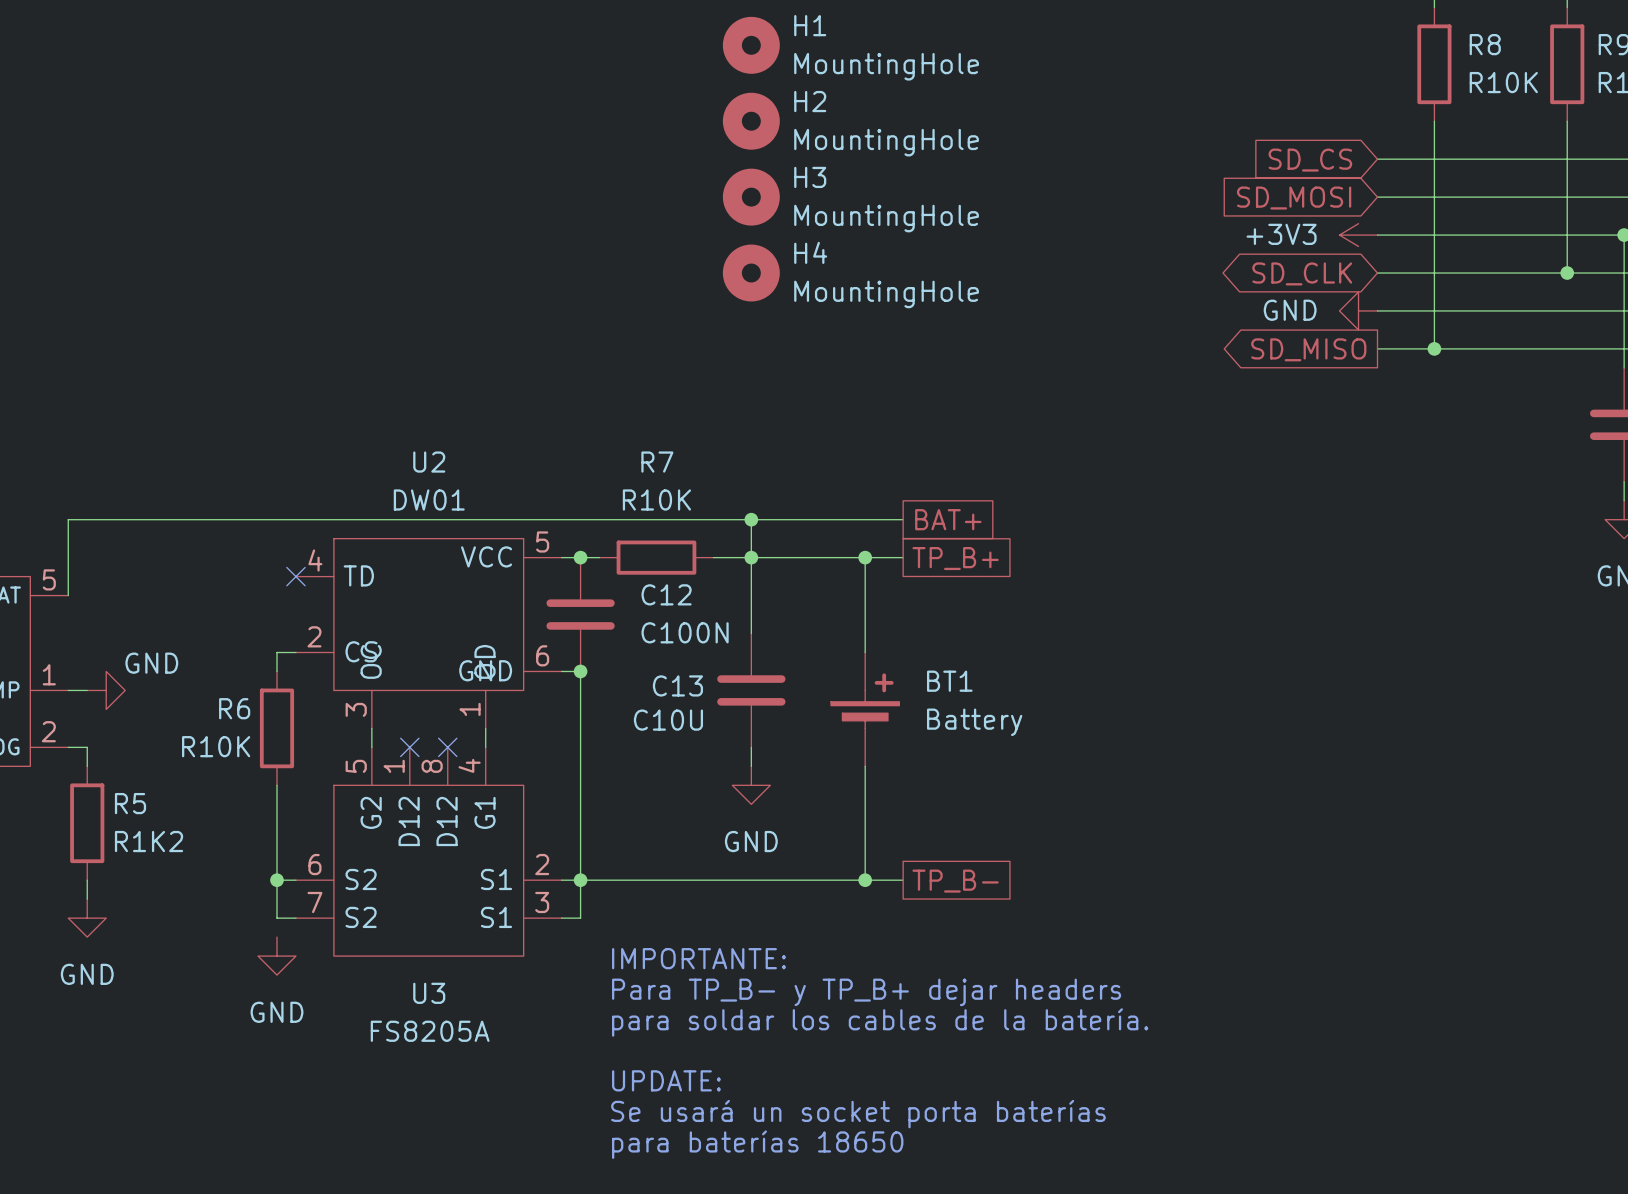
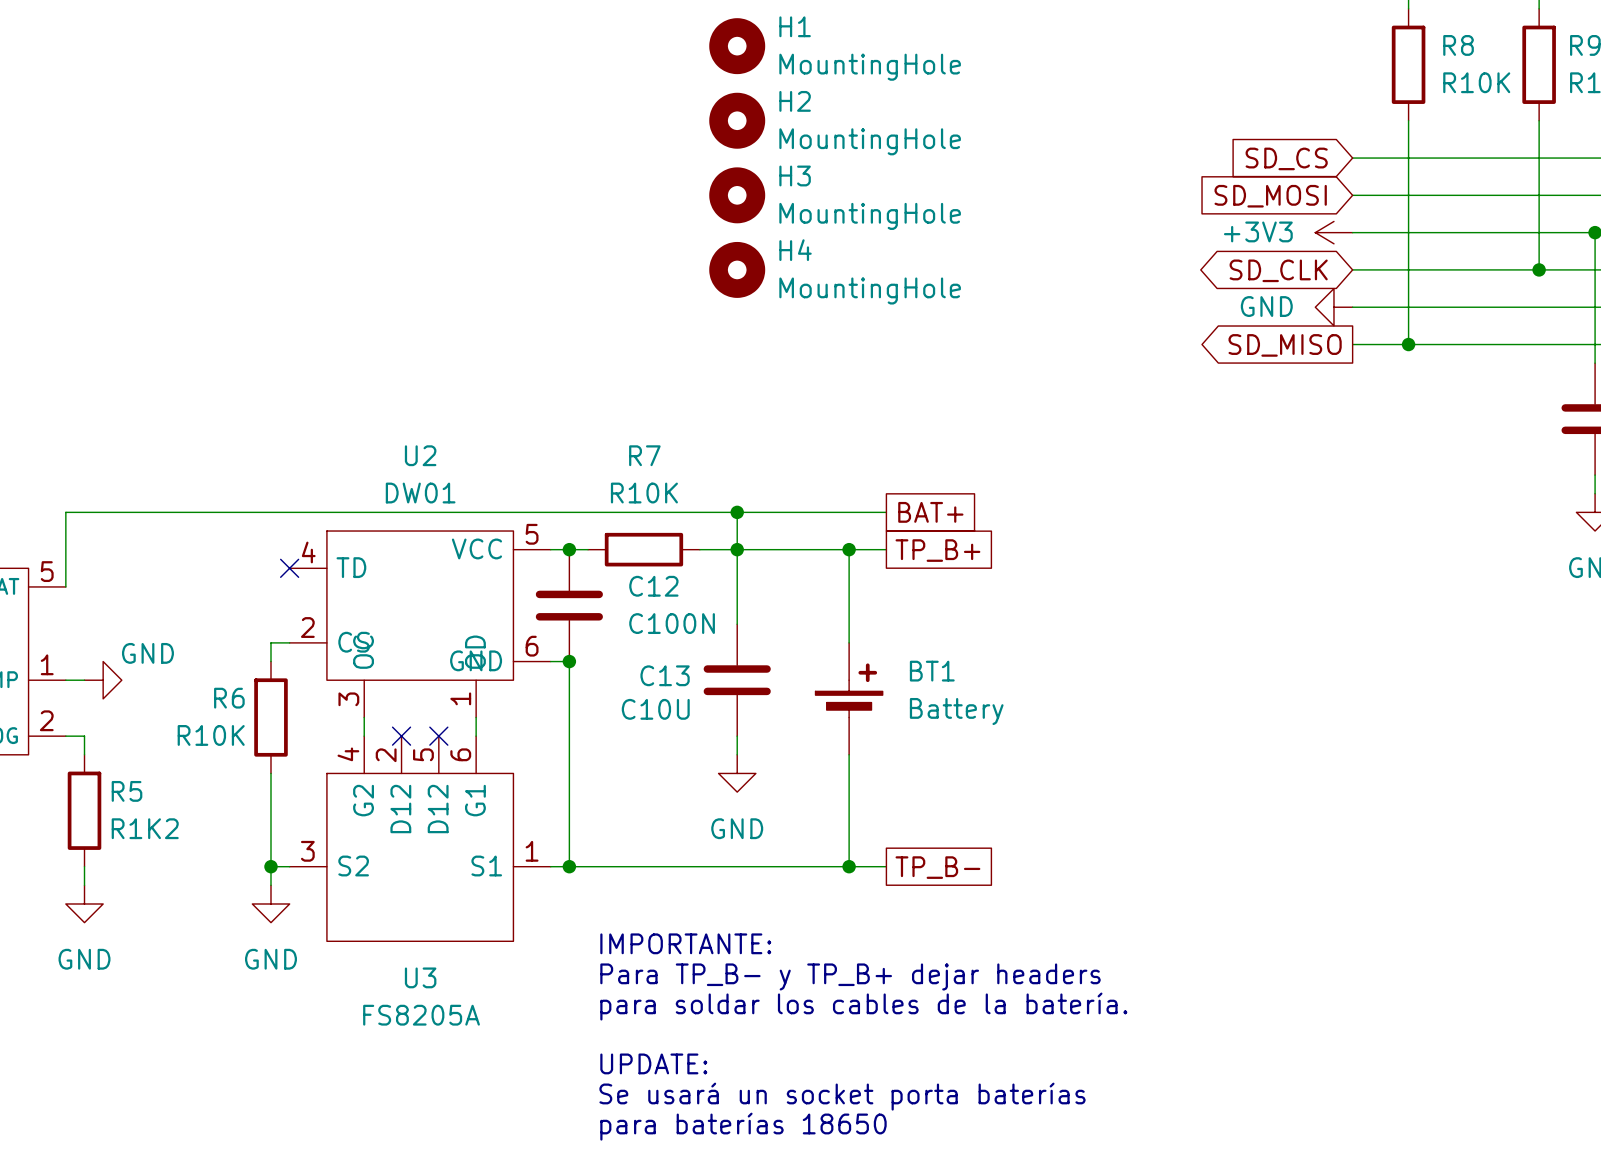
U3 symbol: [295, 747, 562, 957] -> [289, 736, 551, 942]
wire: (580, 880) (580, 918) (561, 918) -> none
power symbol position: GND (276, 956) -> GND (270, 903)

